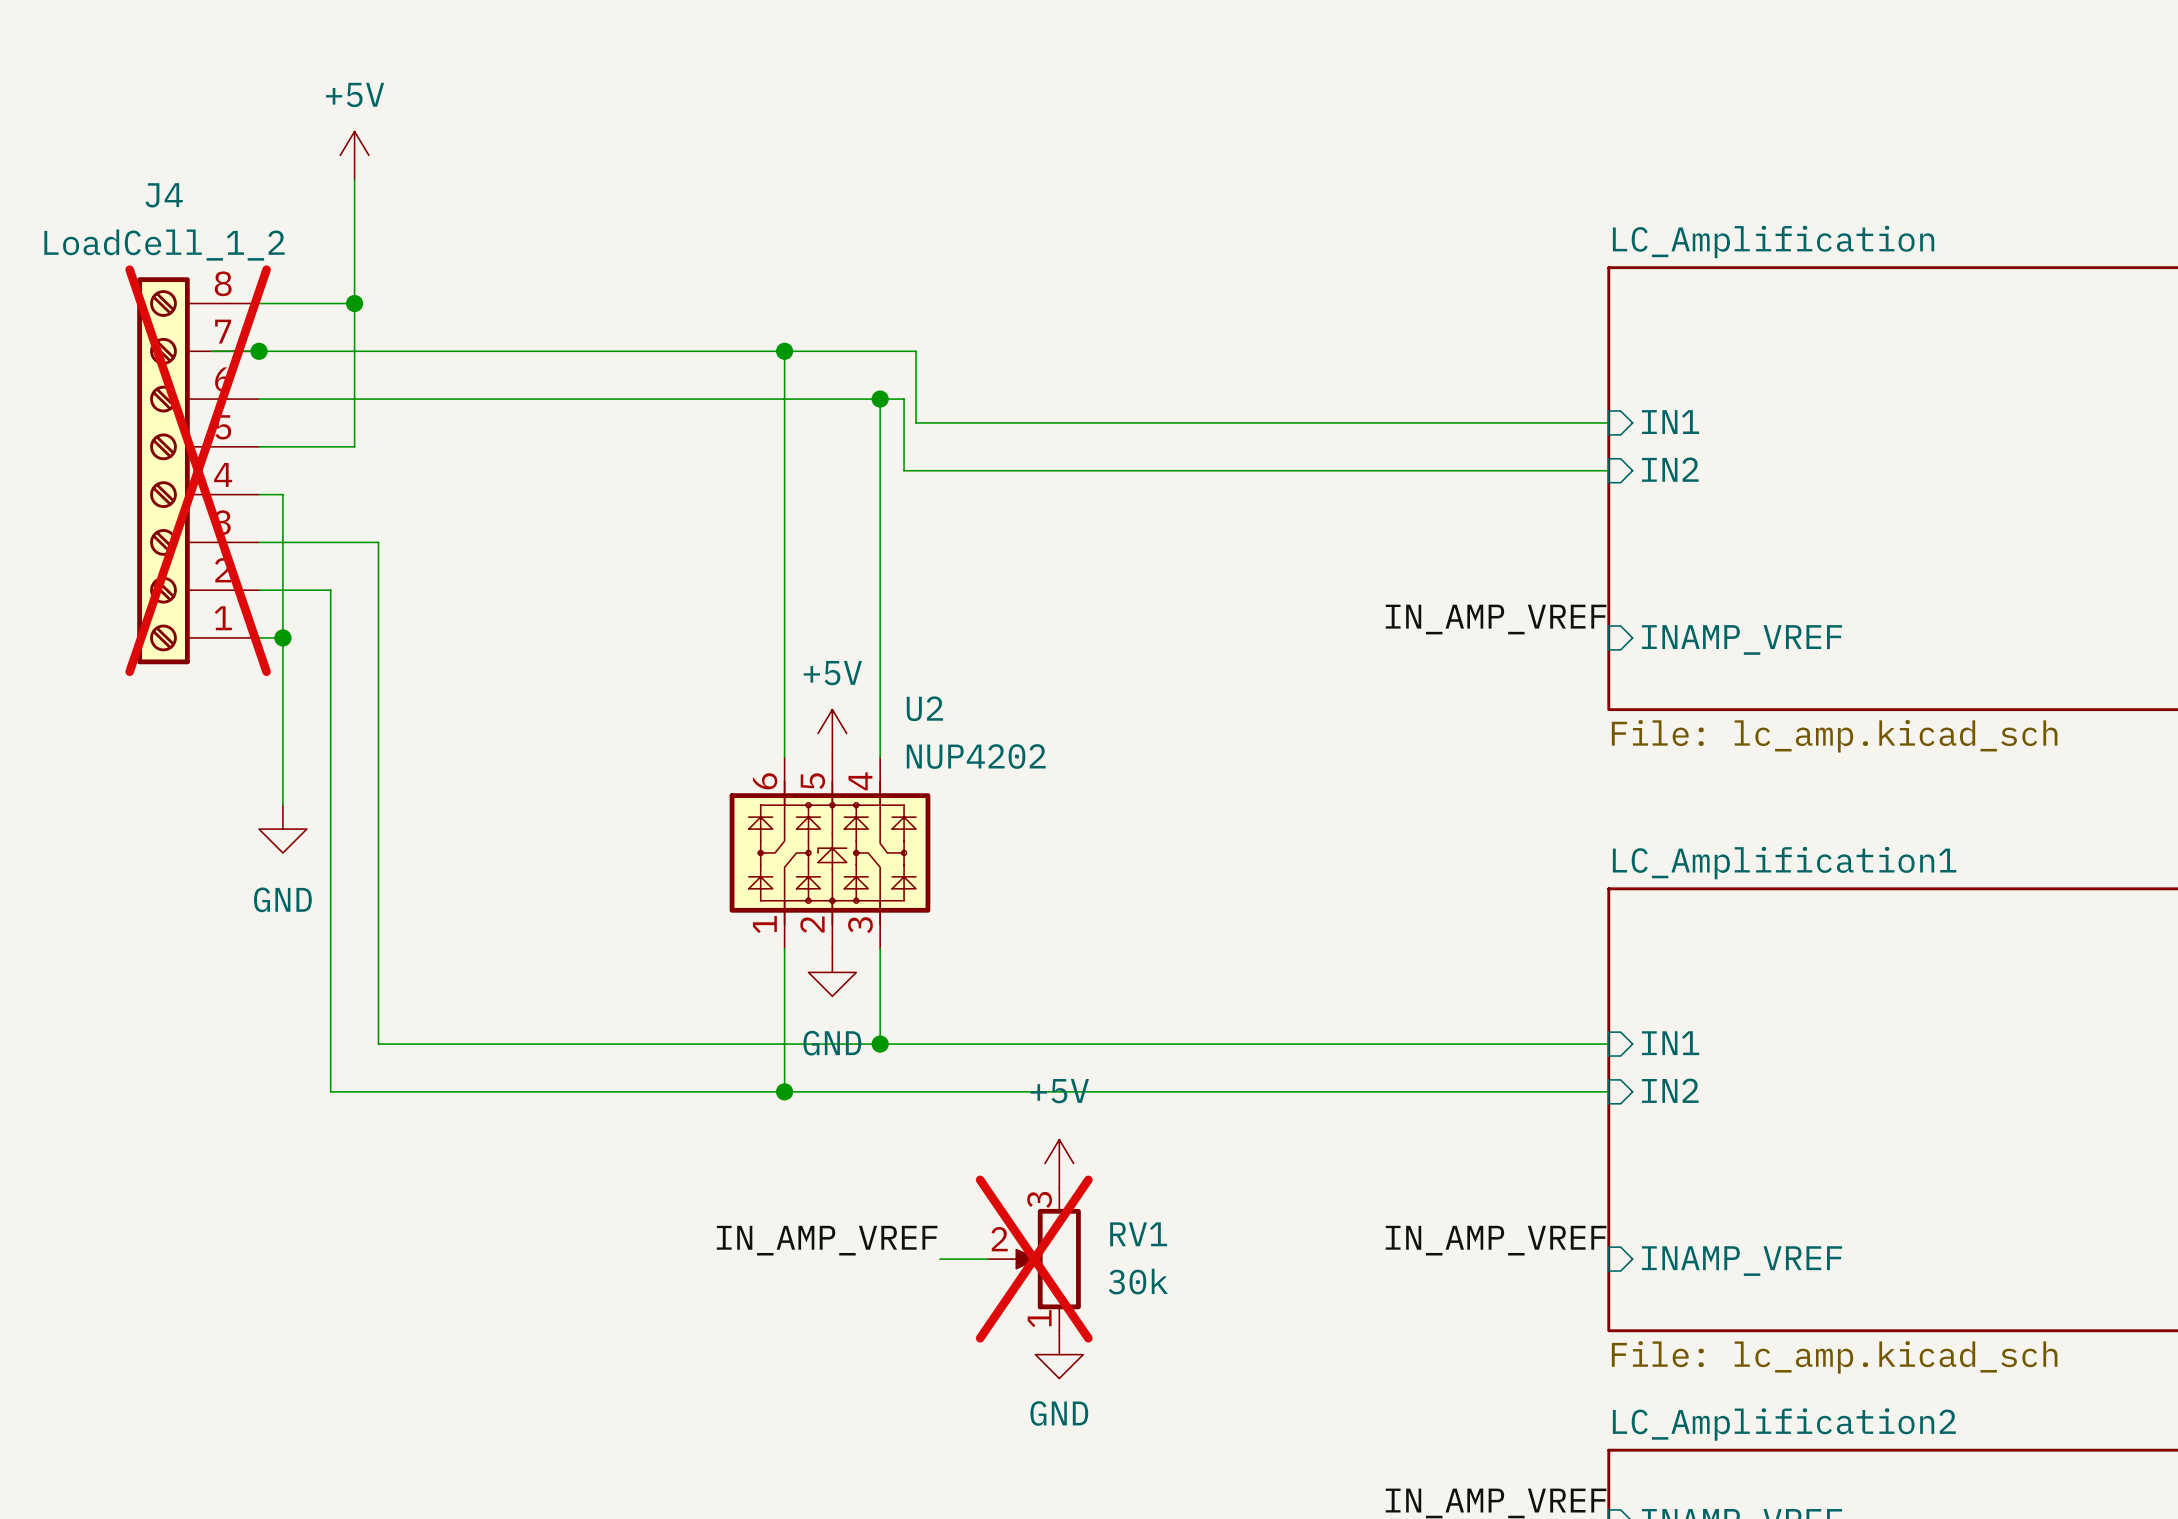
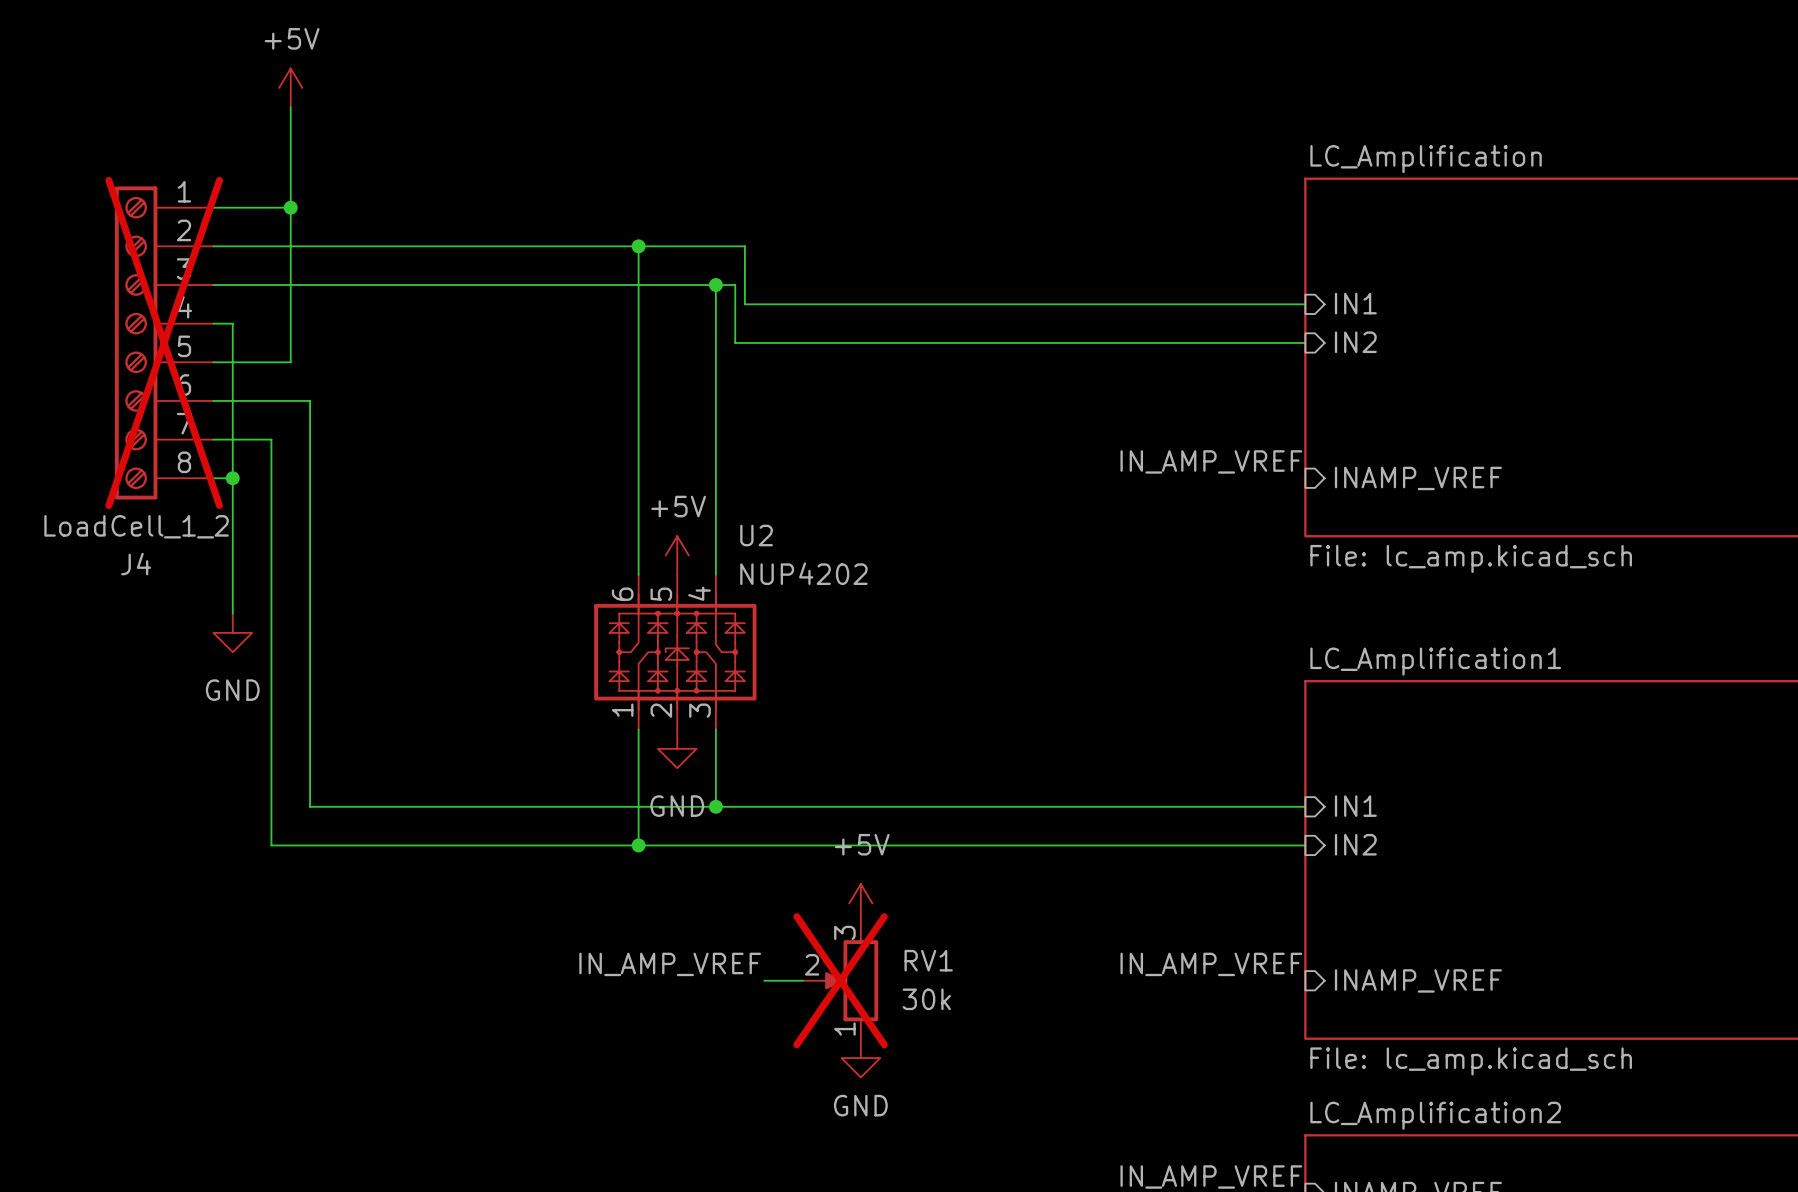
junction: (259, 351) -> none
wire: (282, 446) (354, 446) -> (232, 323) (232, 362) (290, 362) (290, 323)
J4 flip: as is (163, 470) -> up-down (136, 342)

